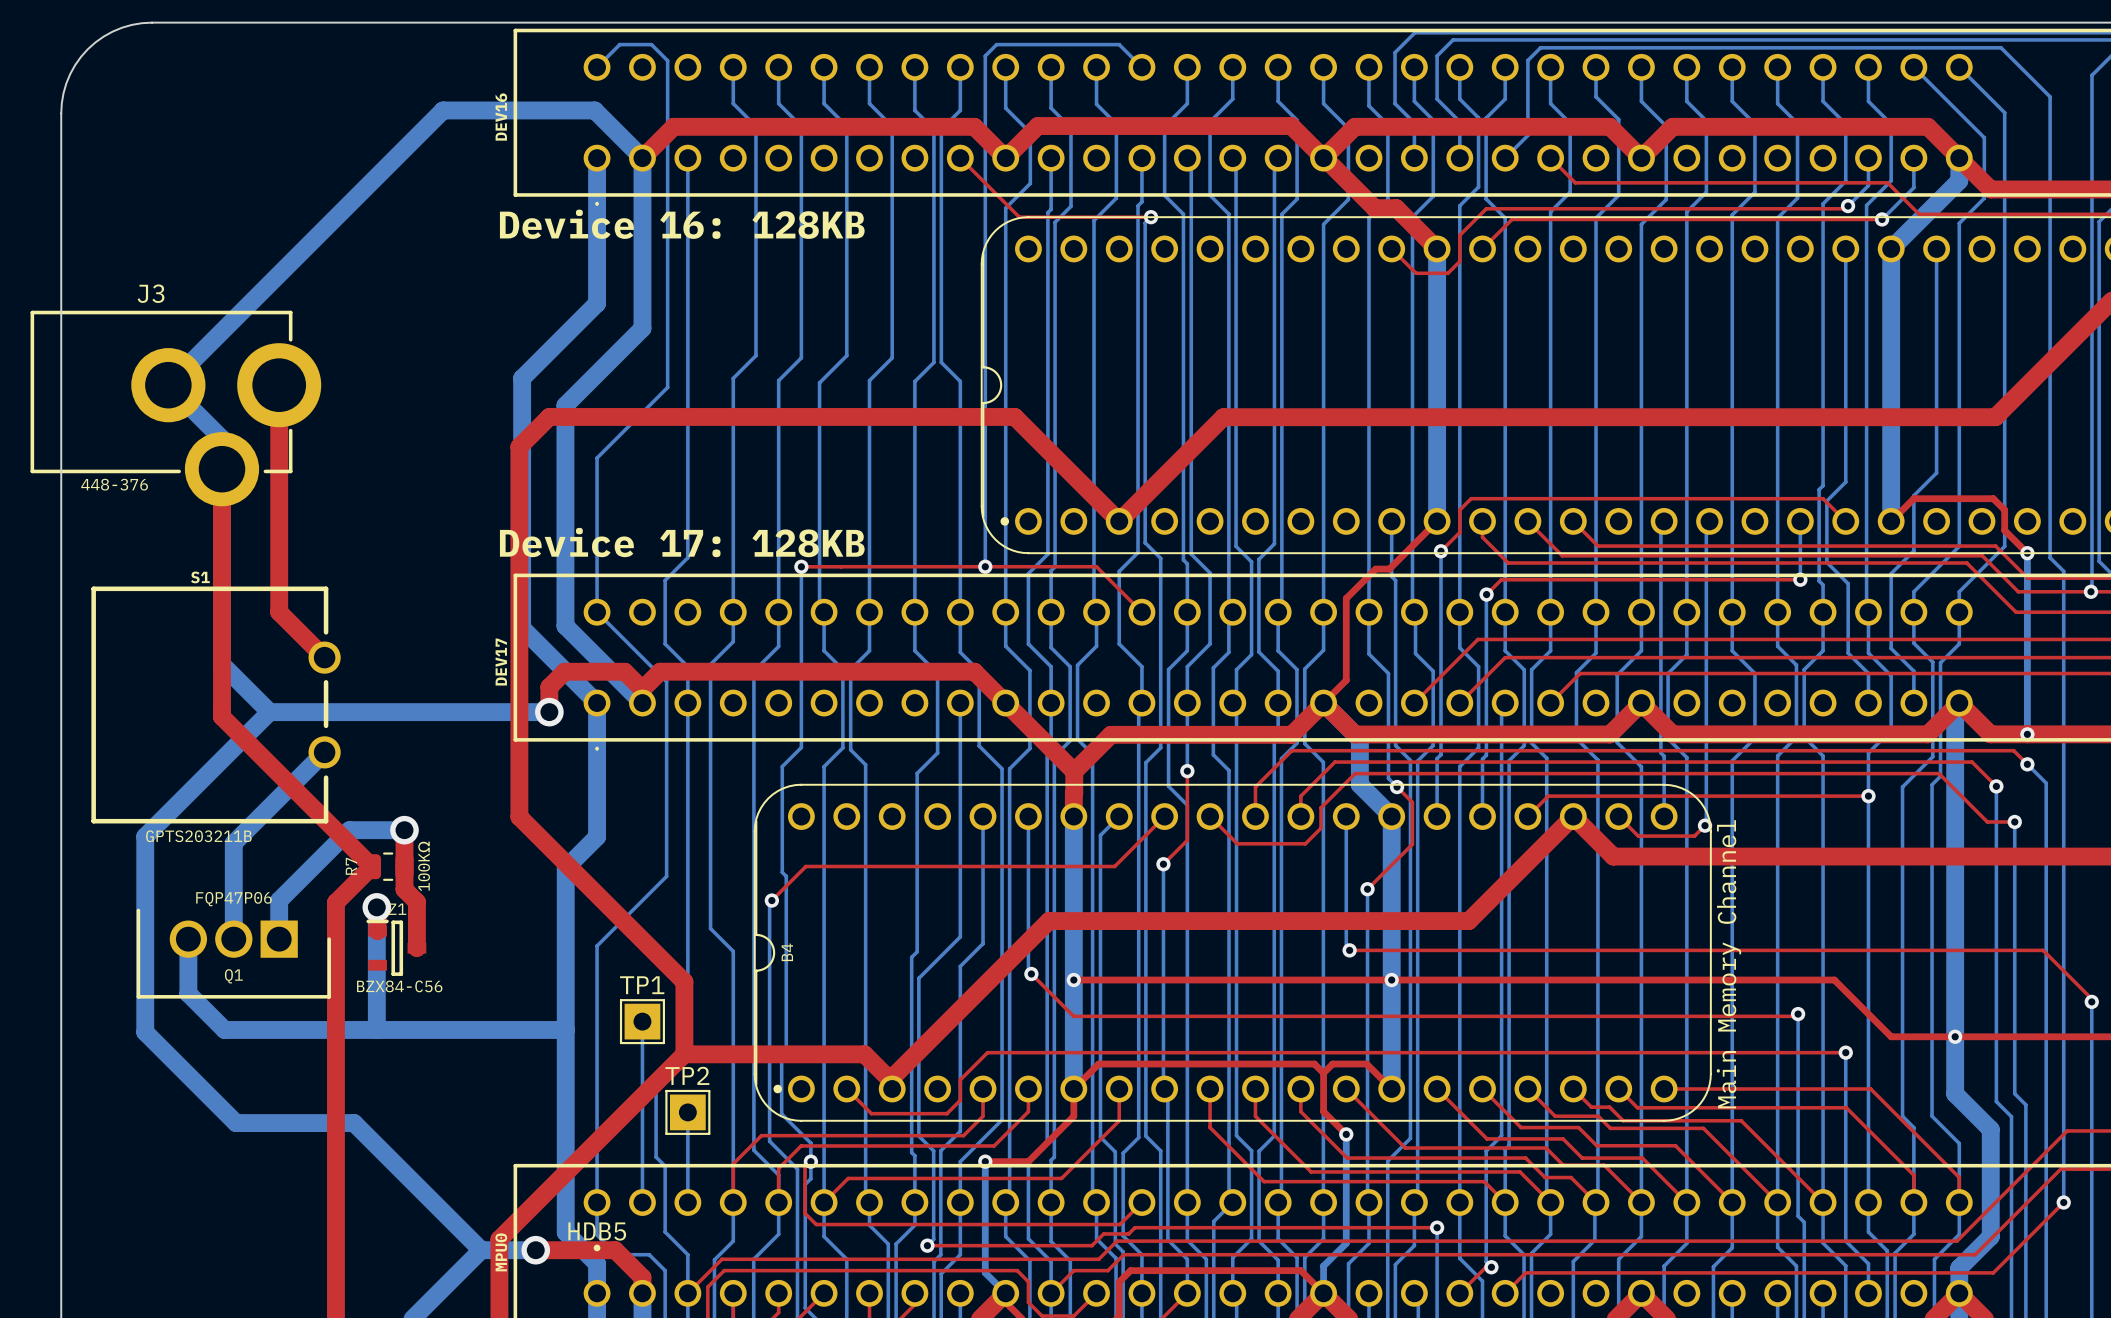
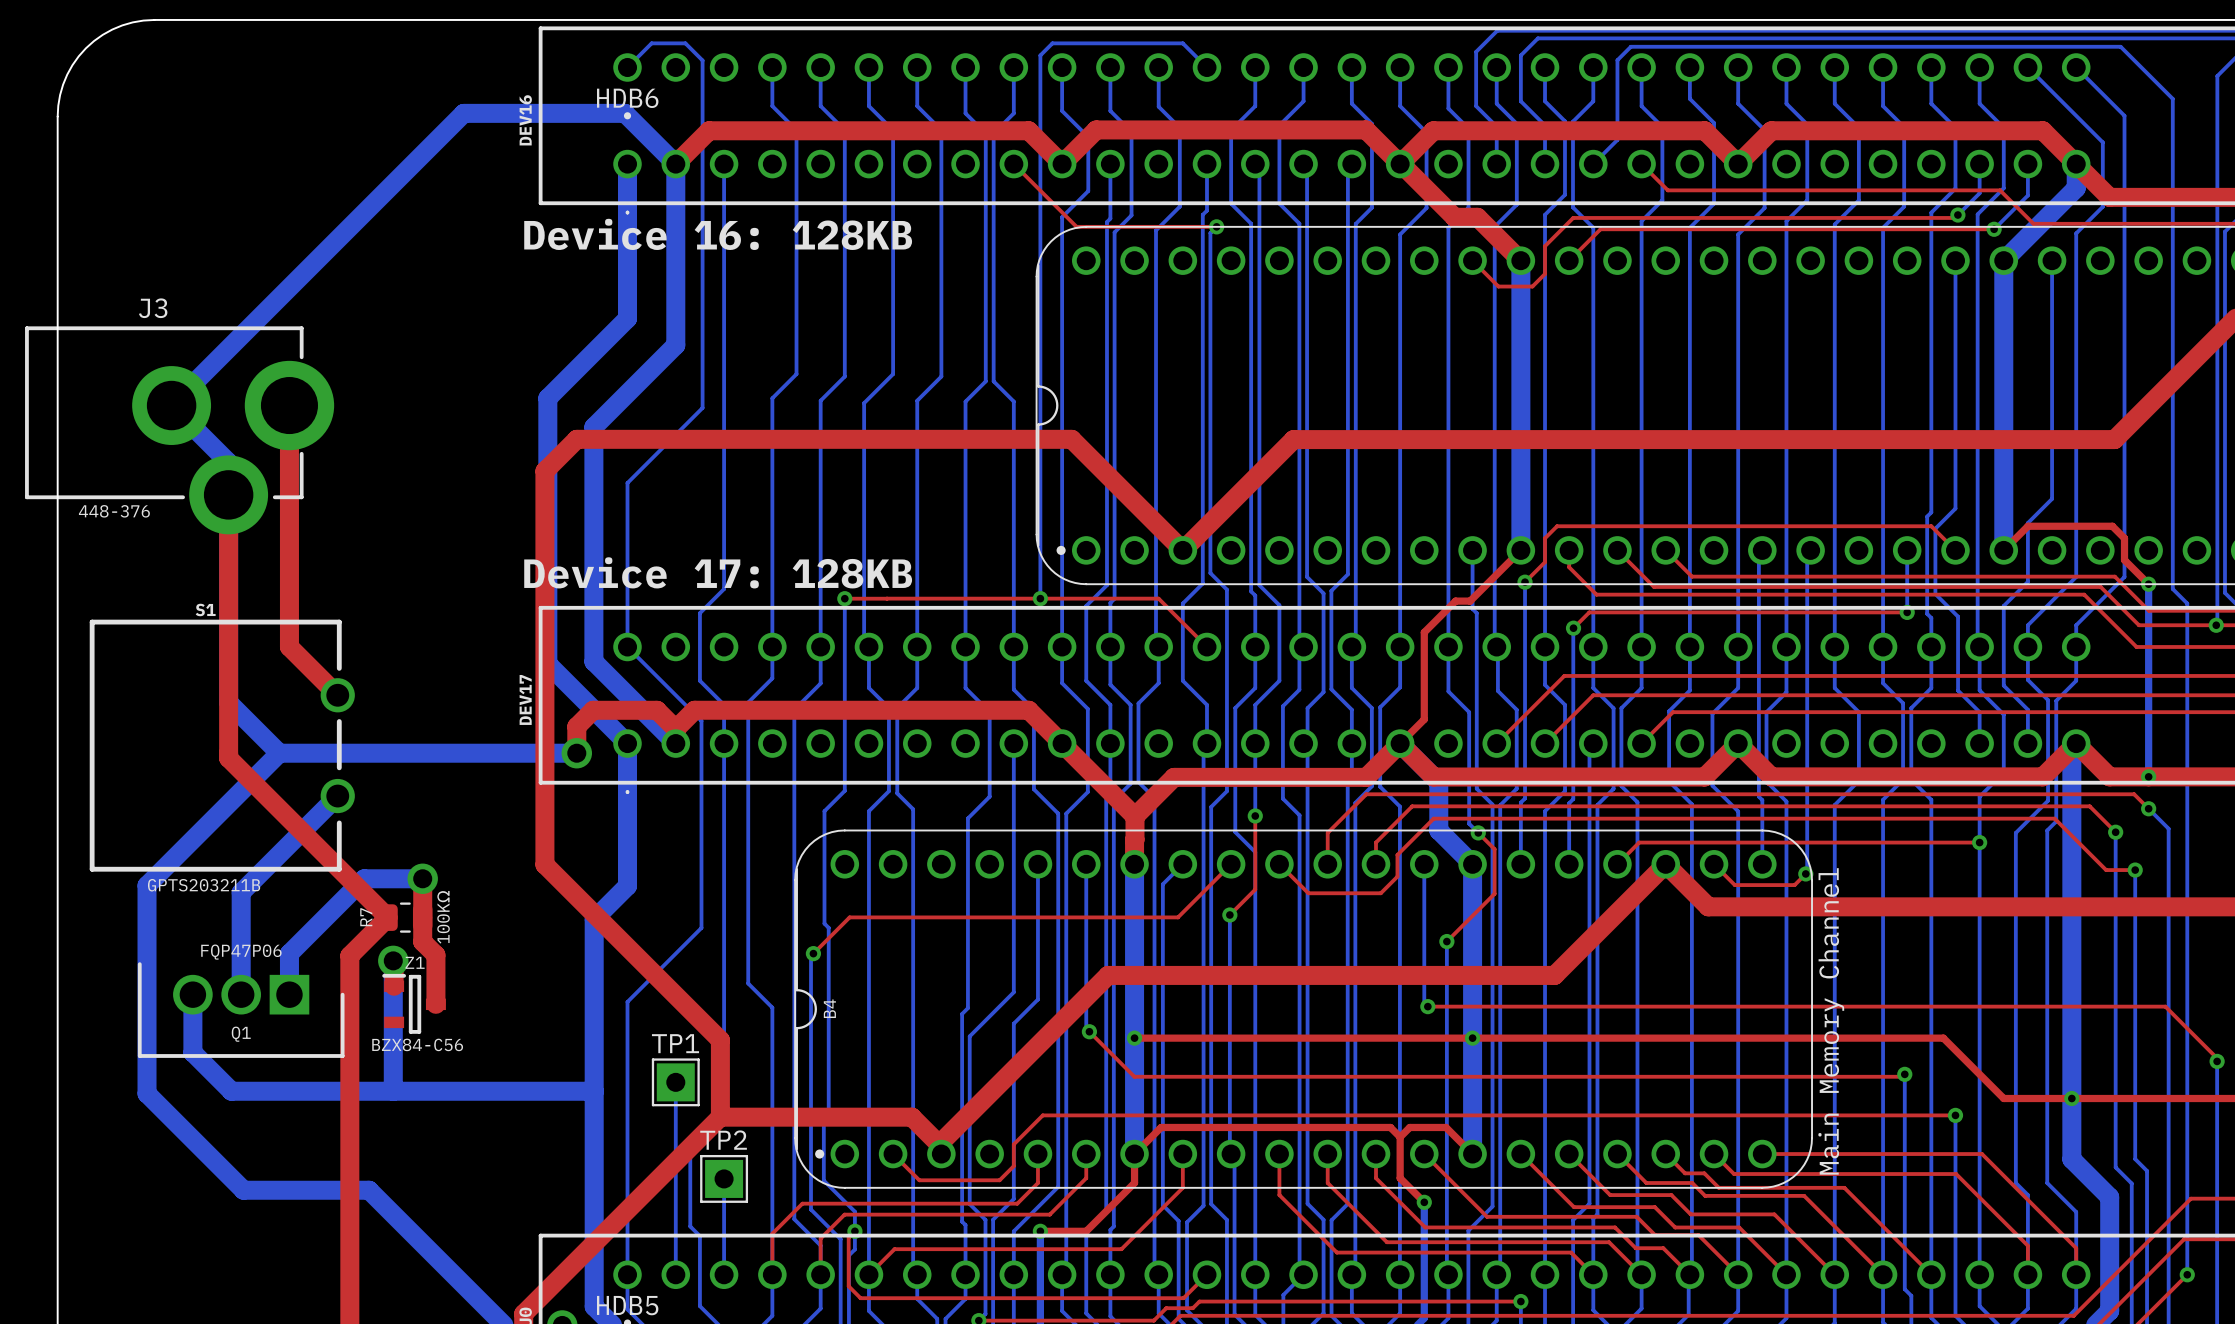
HDB6: none -> (627, 115)

